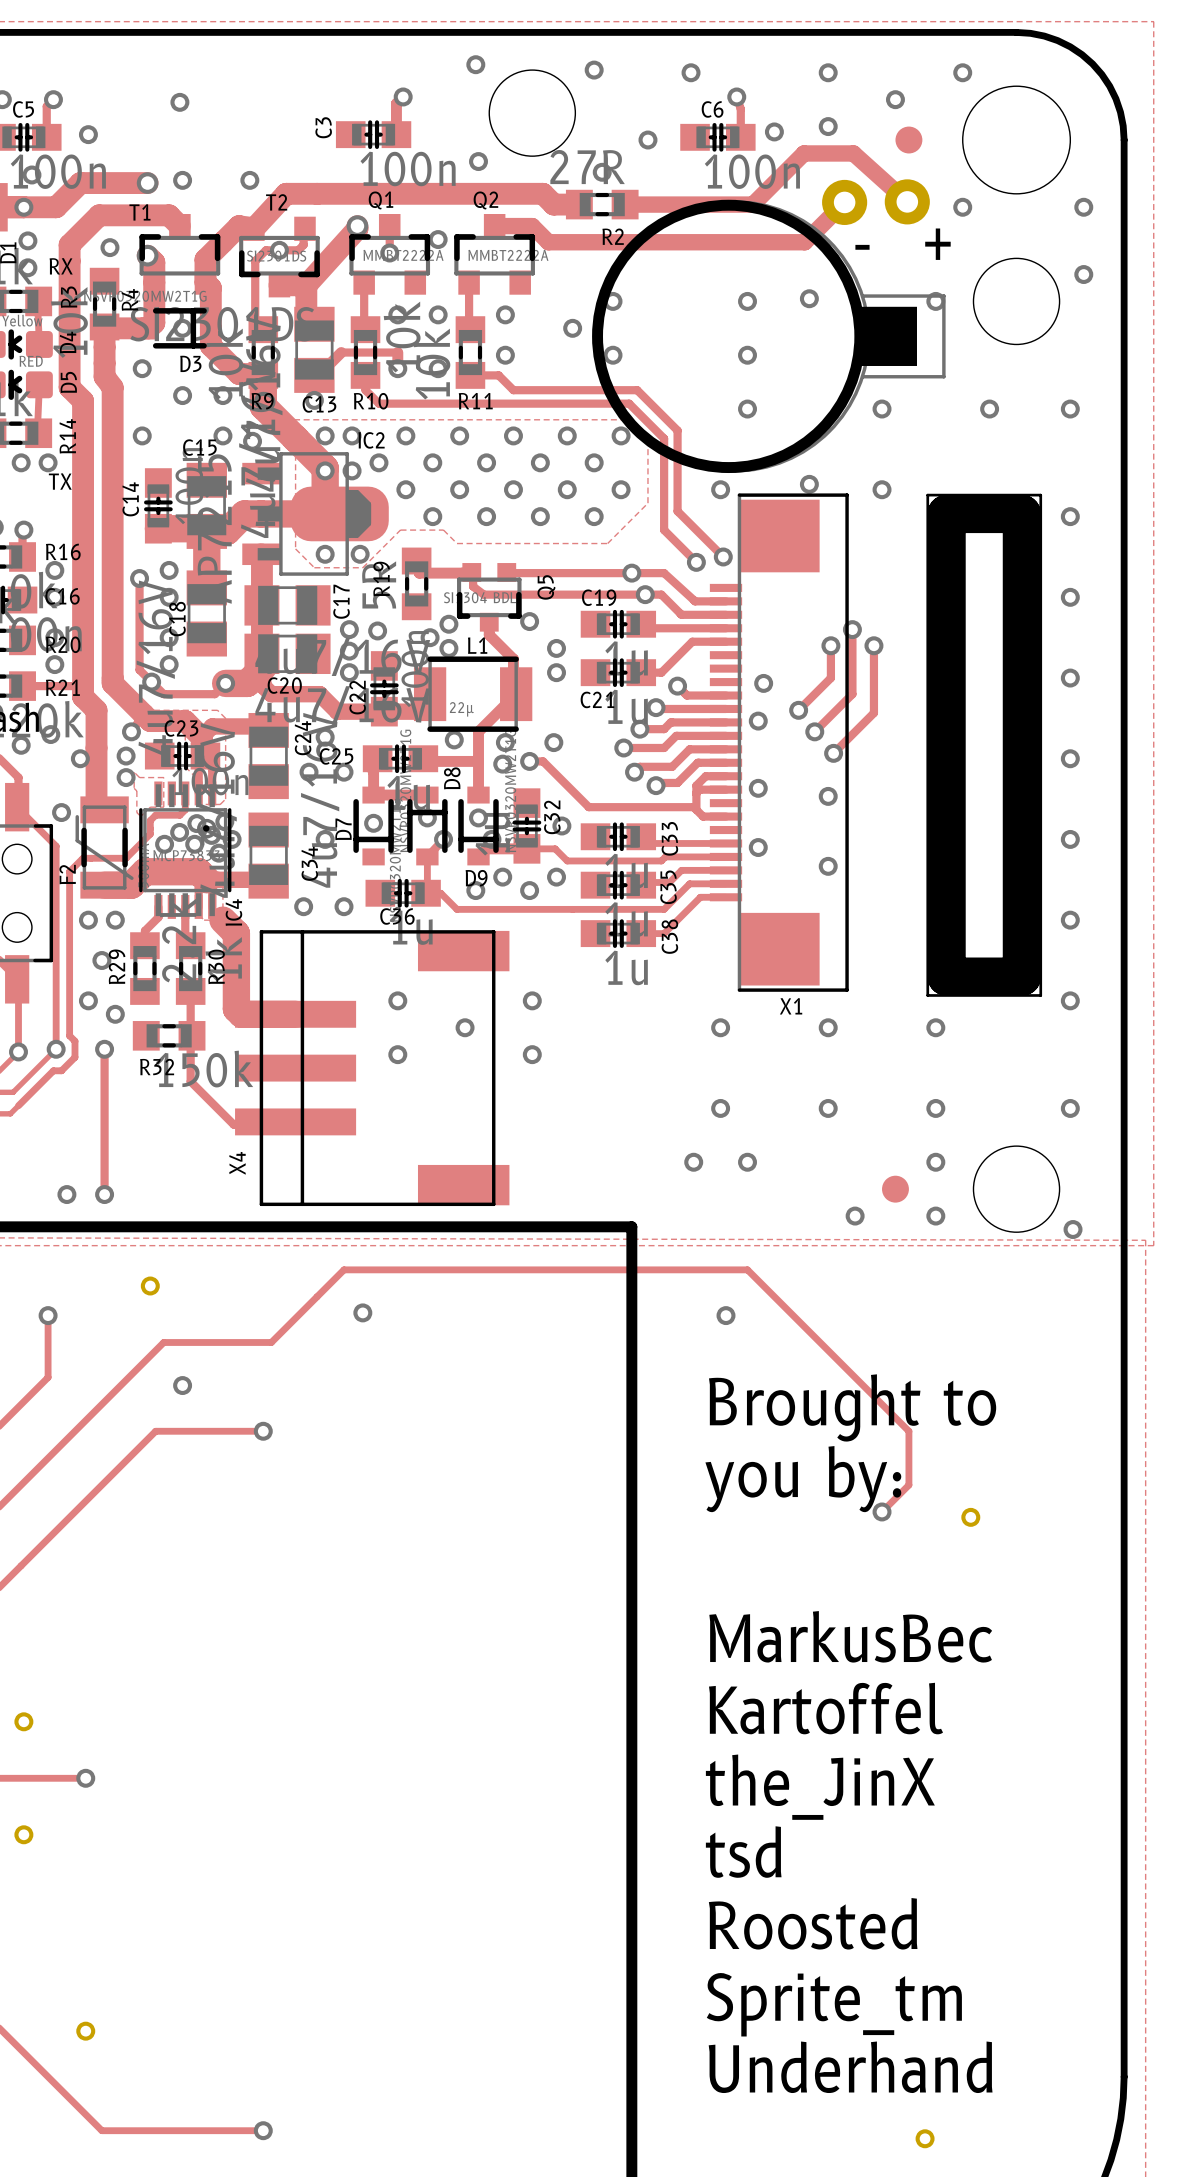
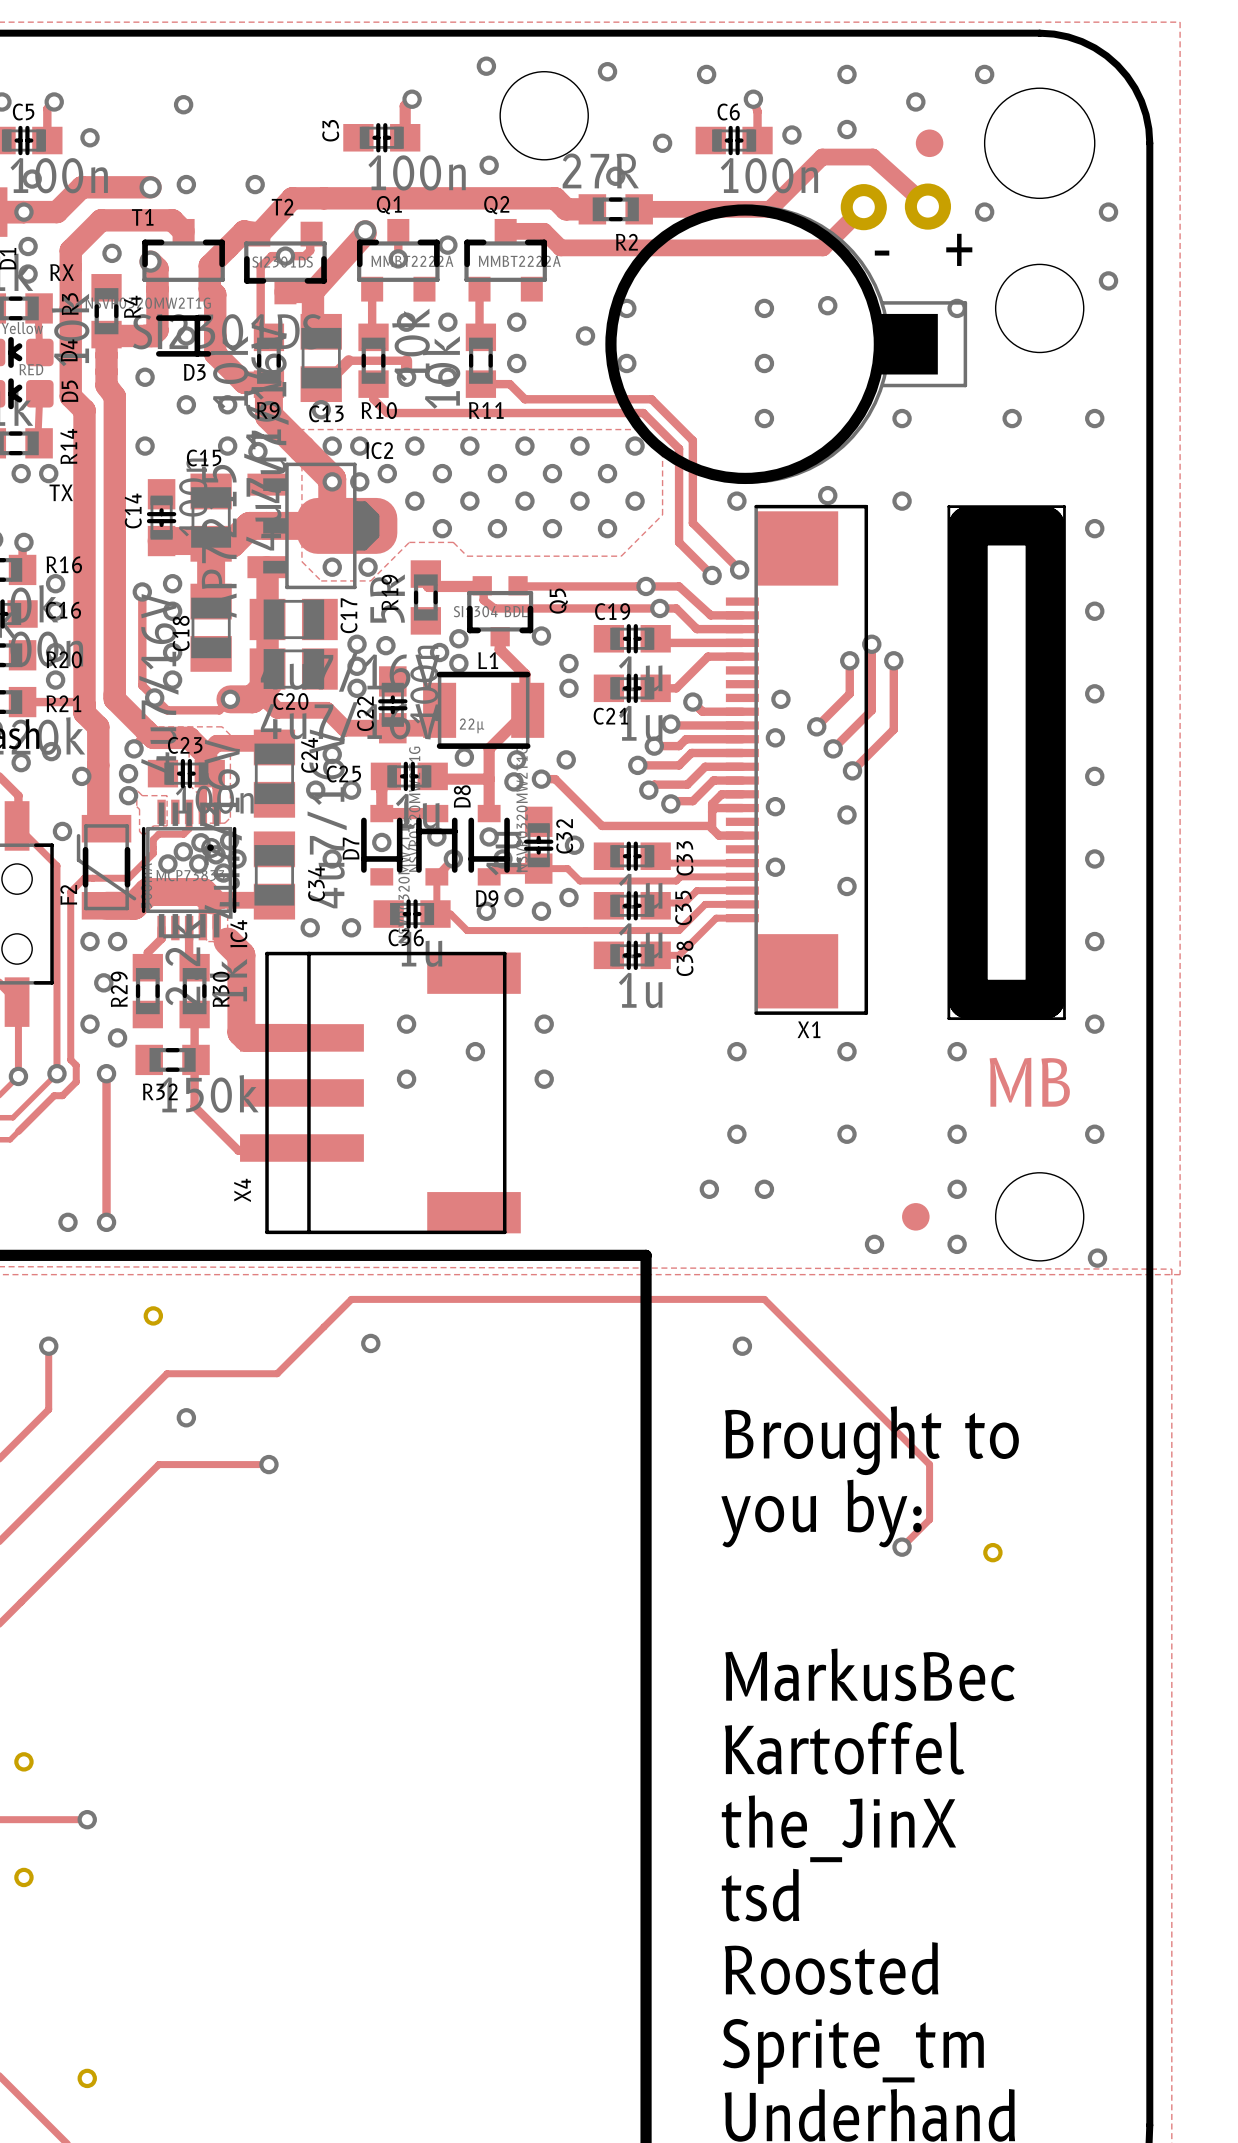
text: none -> MB (1029, 1082)

